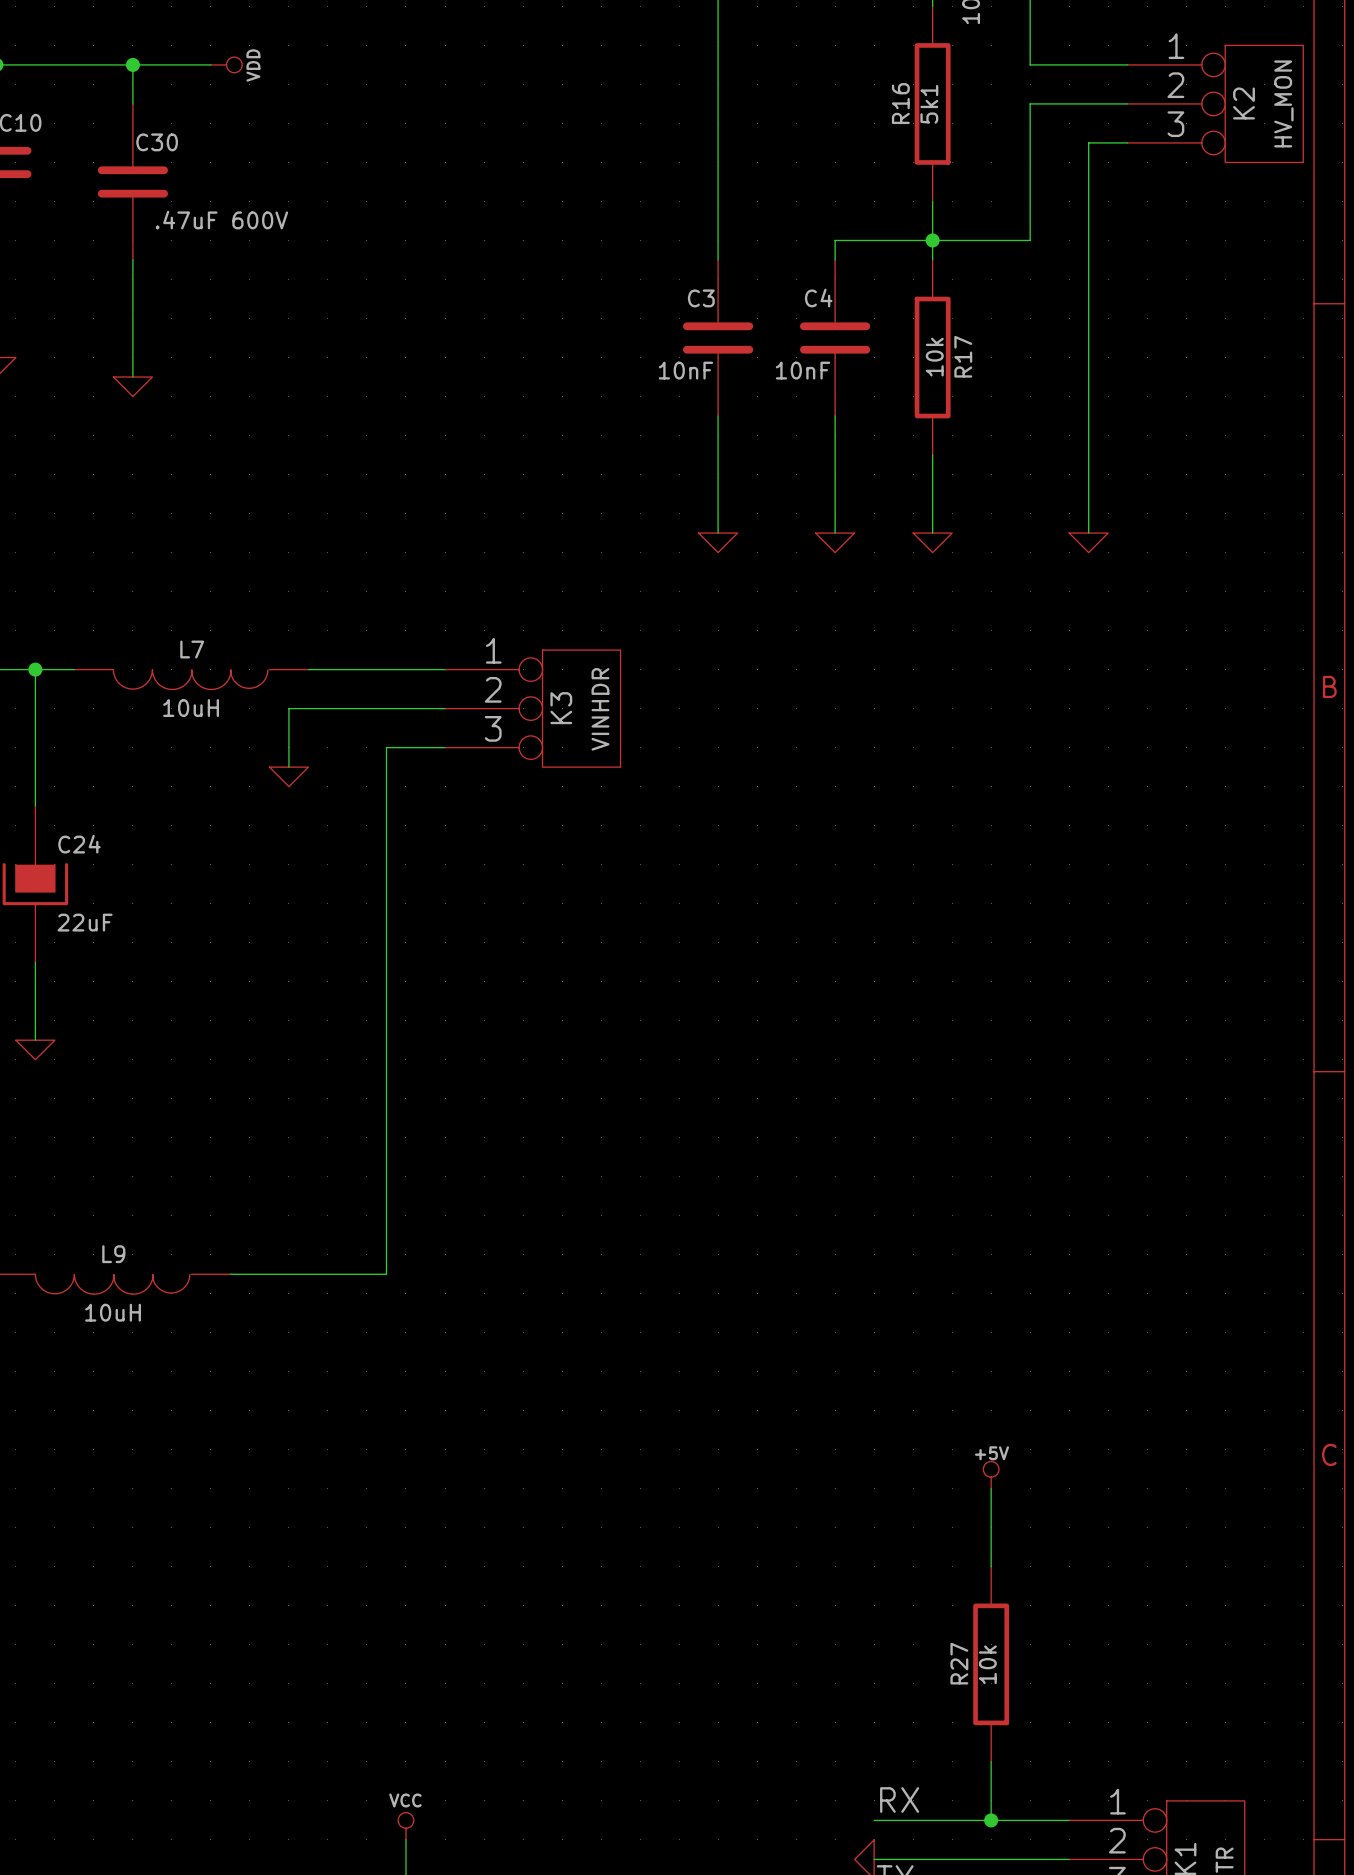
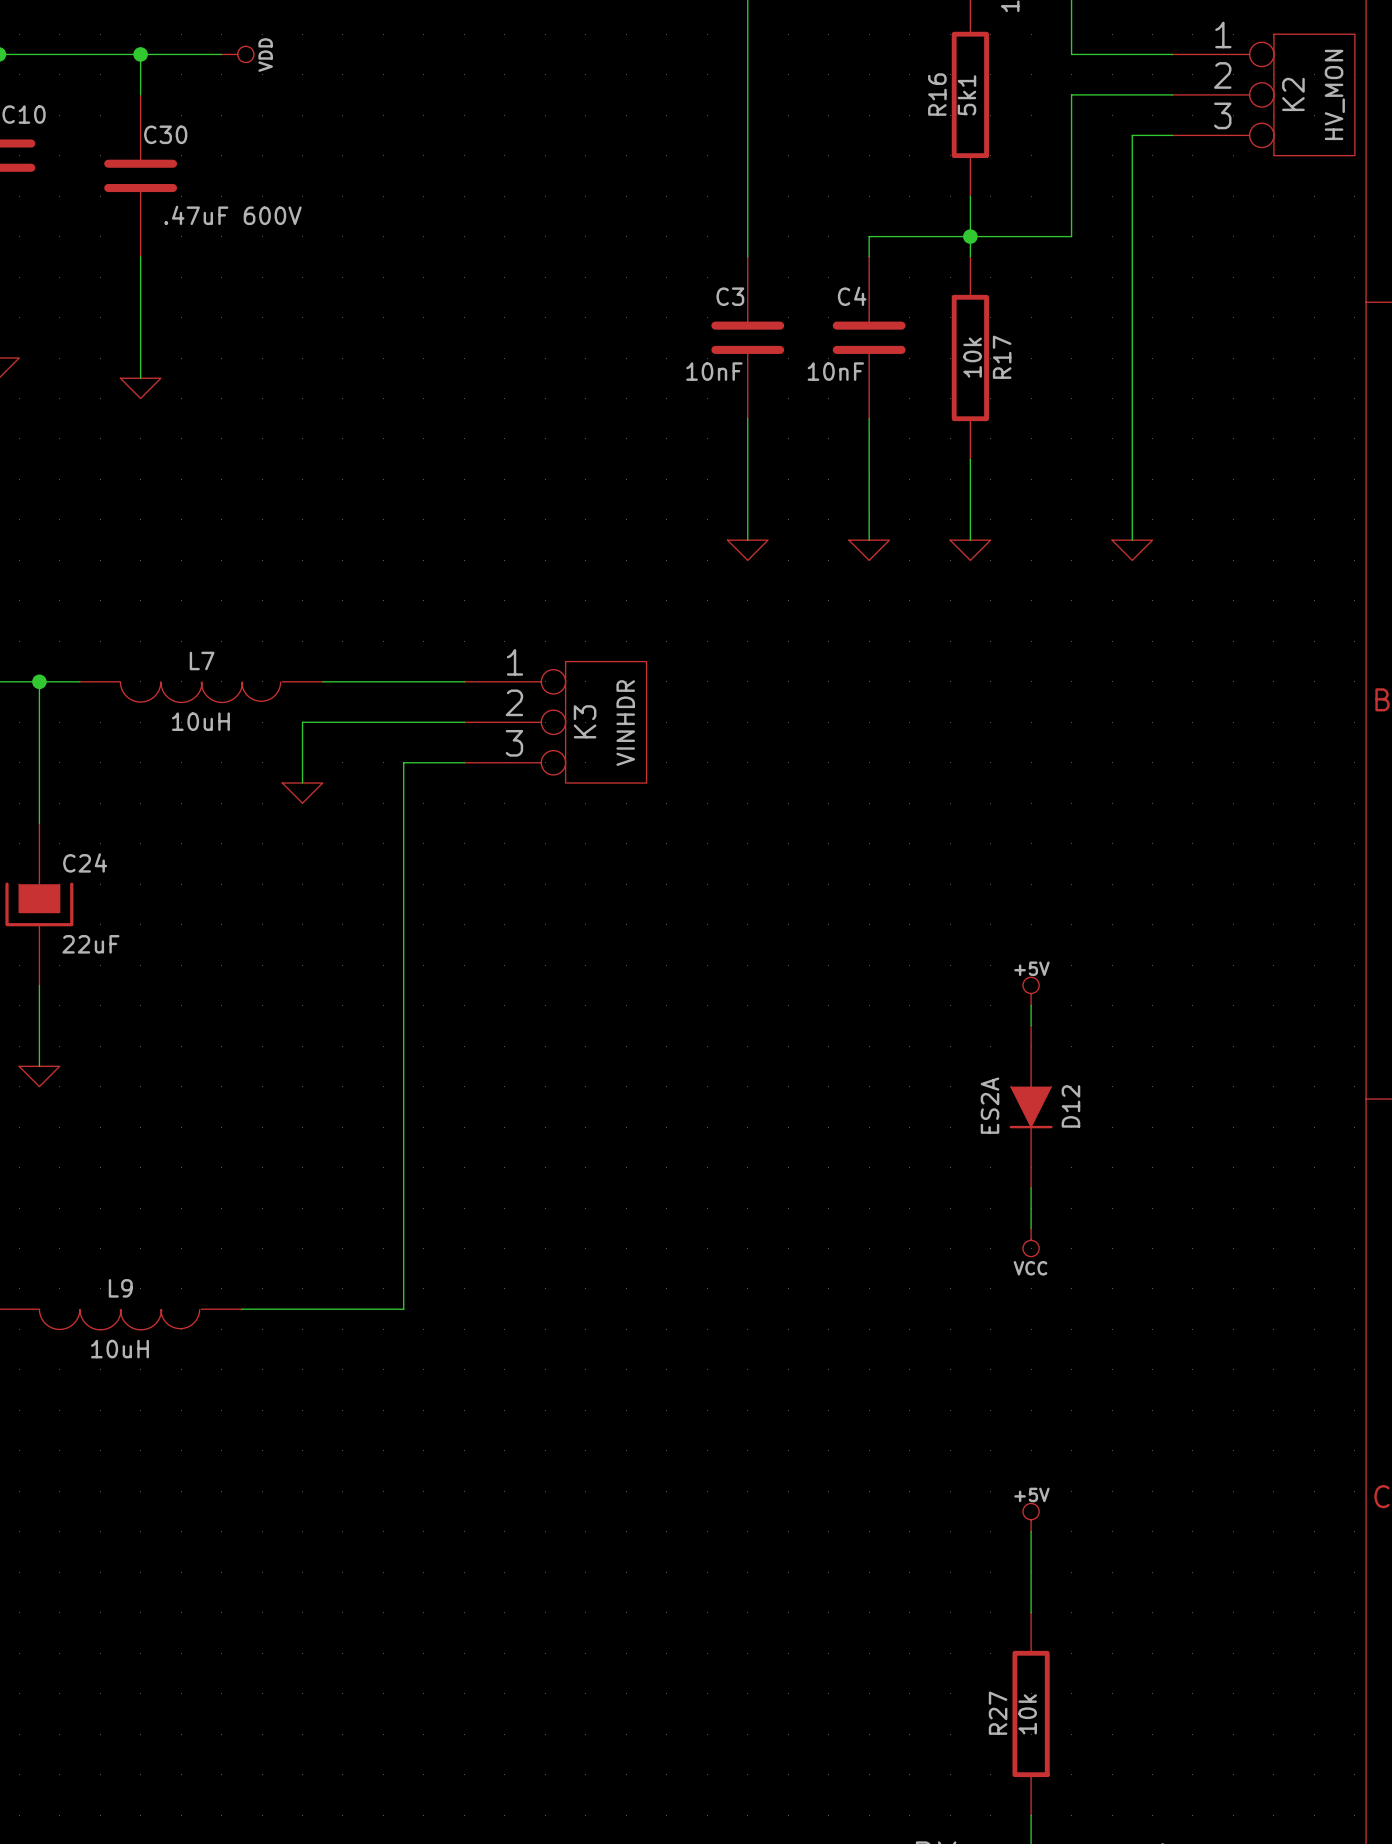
power symbol: none -> +5V (1031, 991)
wire: none -> (1031, 1005) (1031, 1025)
D12: none -> ES2A (1031, 1106)
wire: none -> (1031, 1187) (1031, 1228)
power symbol: none -> VCC (1031, 1242)

